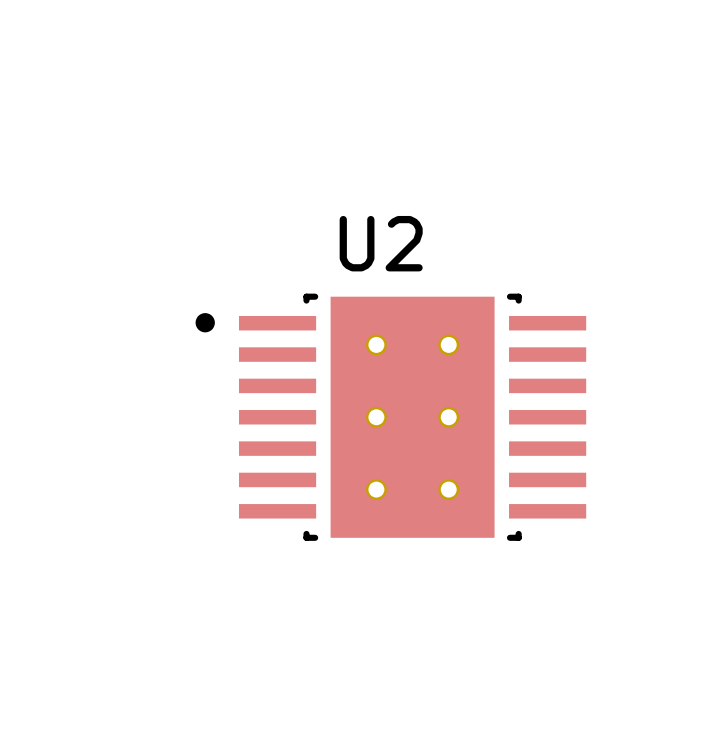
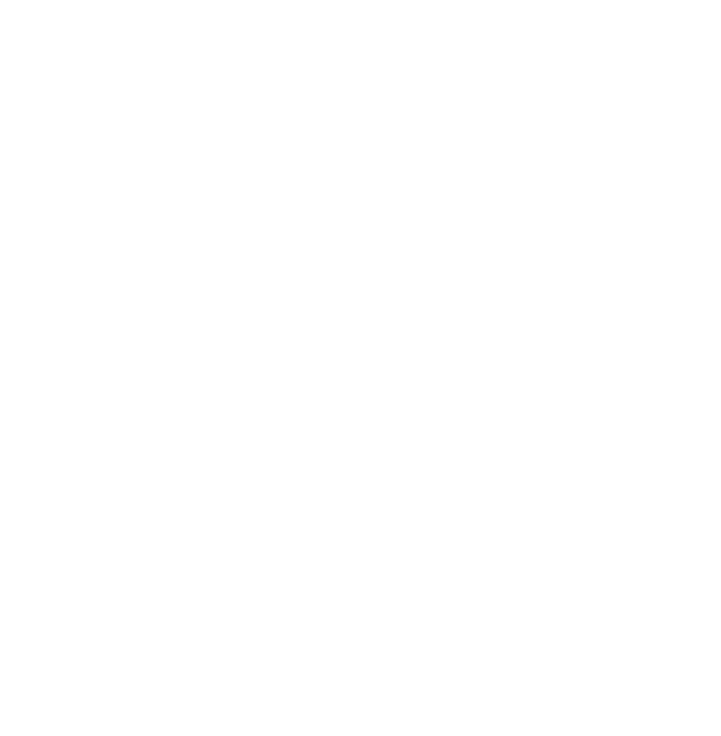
U2: (390, 417) -> none

